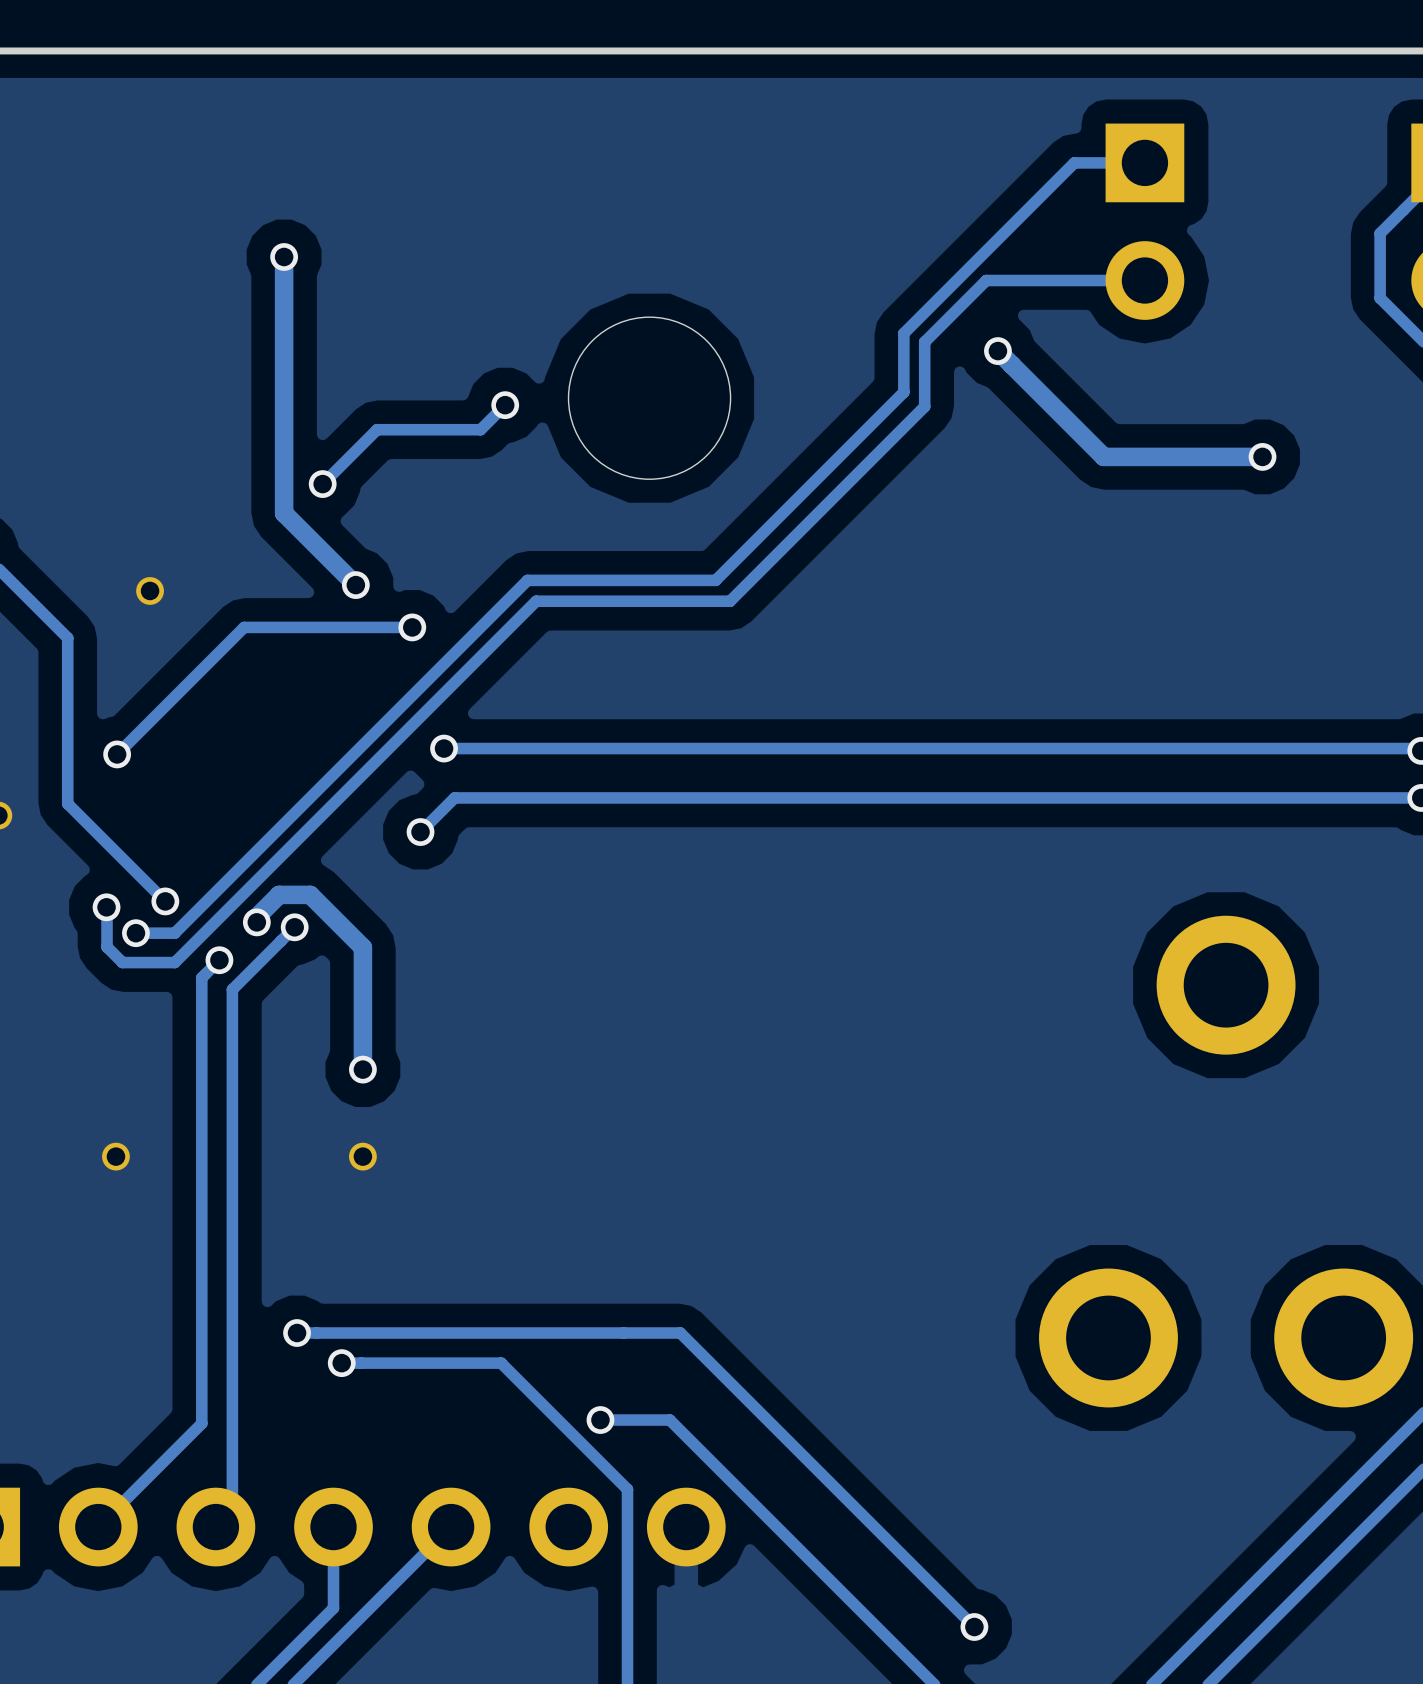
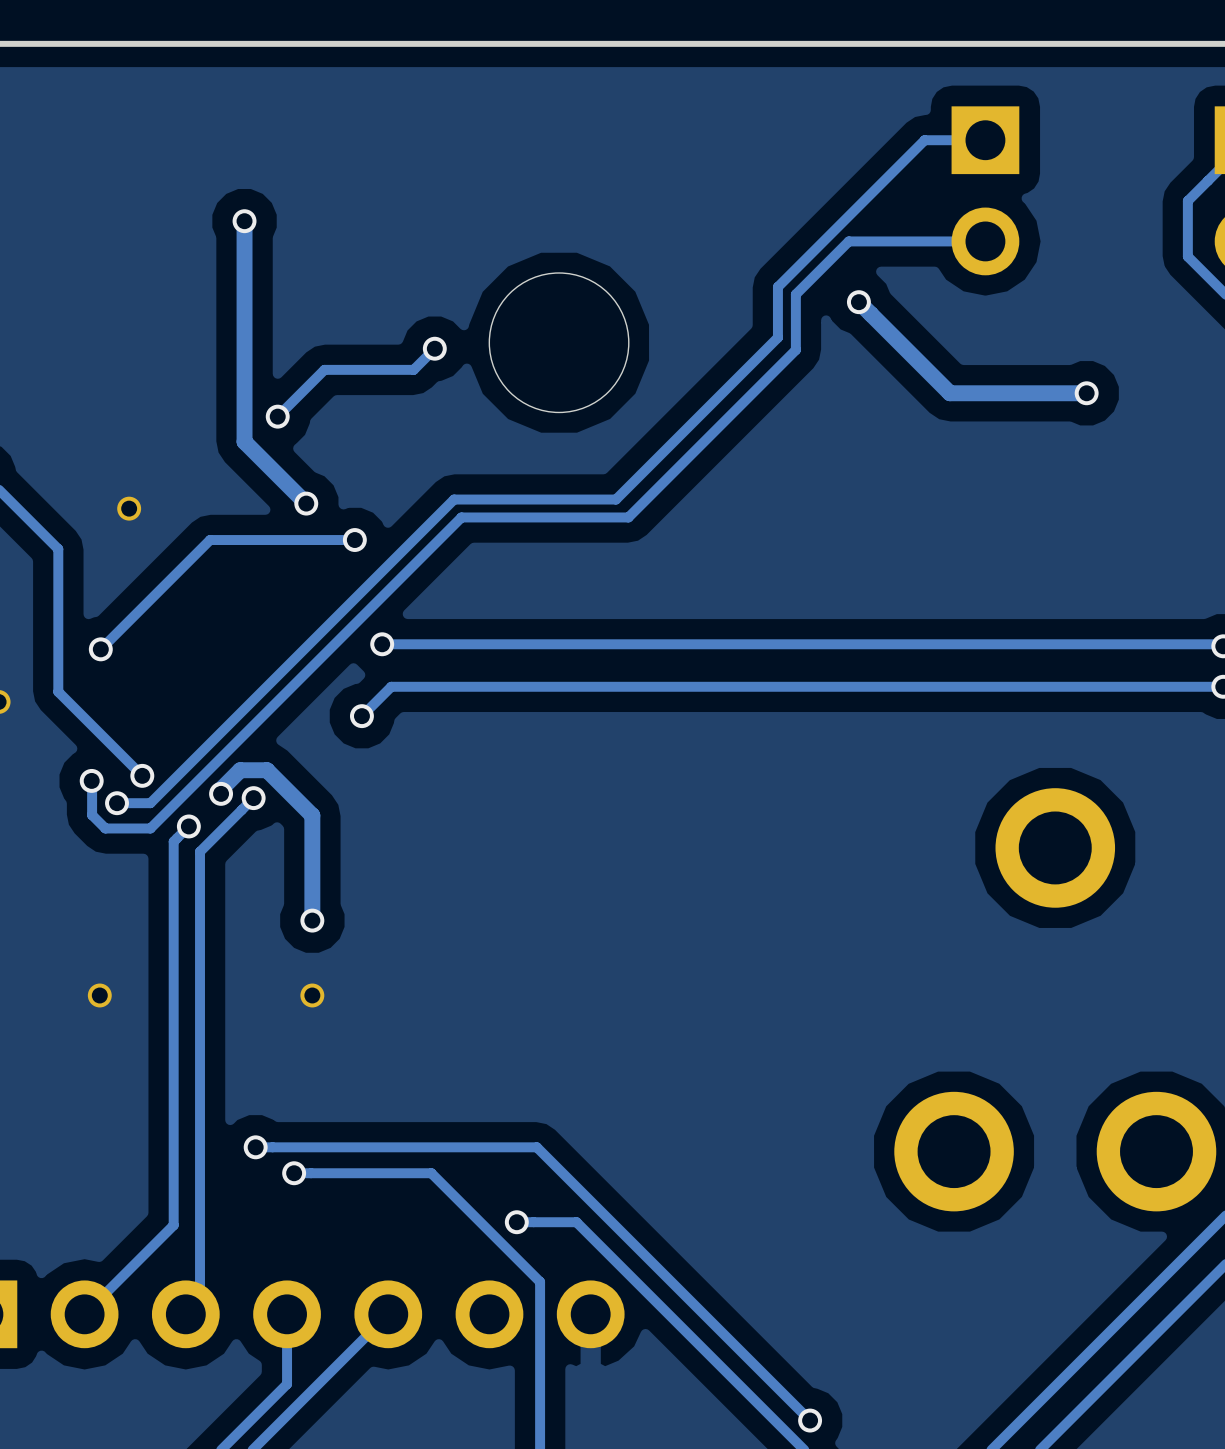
track: (623, 1333) (680, 1333) (974, 1627) -> (536, 1147) (810, 1420)
via position: (974, 1627) -> (810, 1420)

